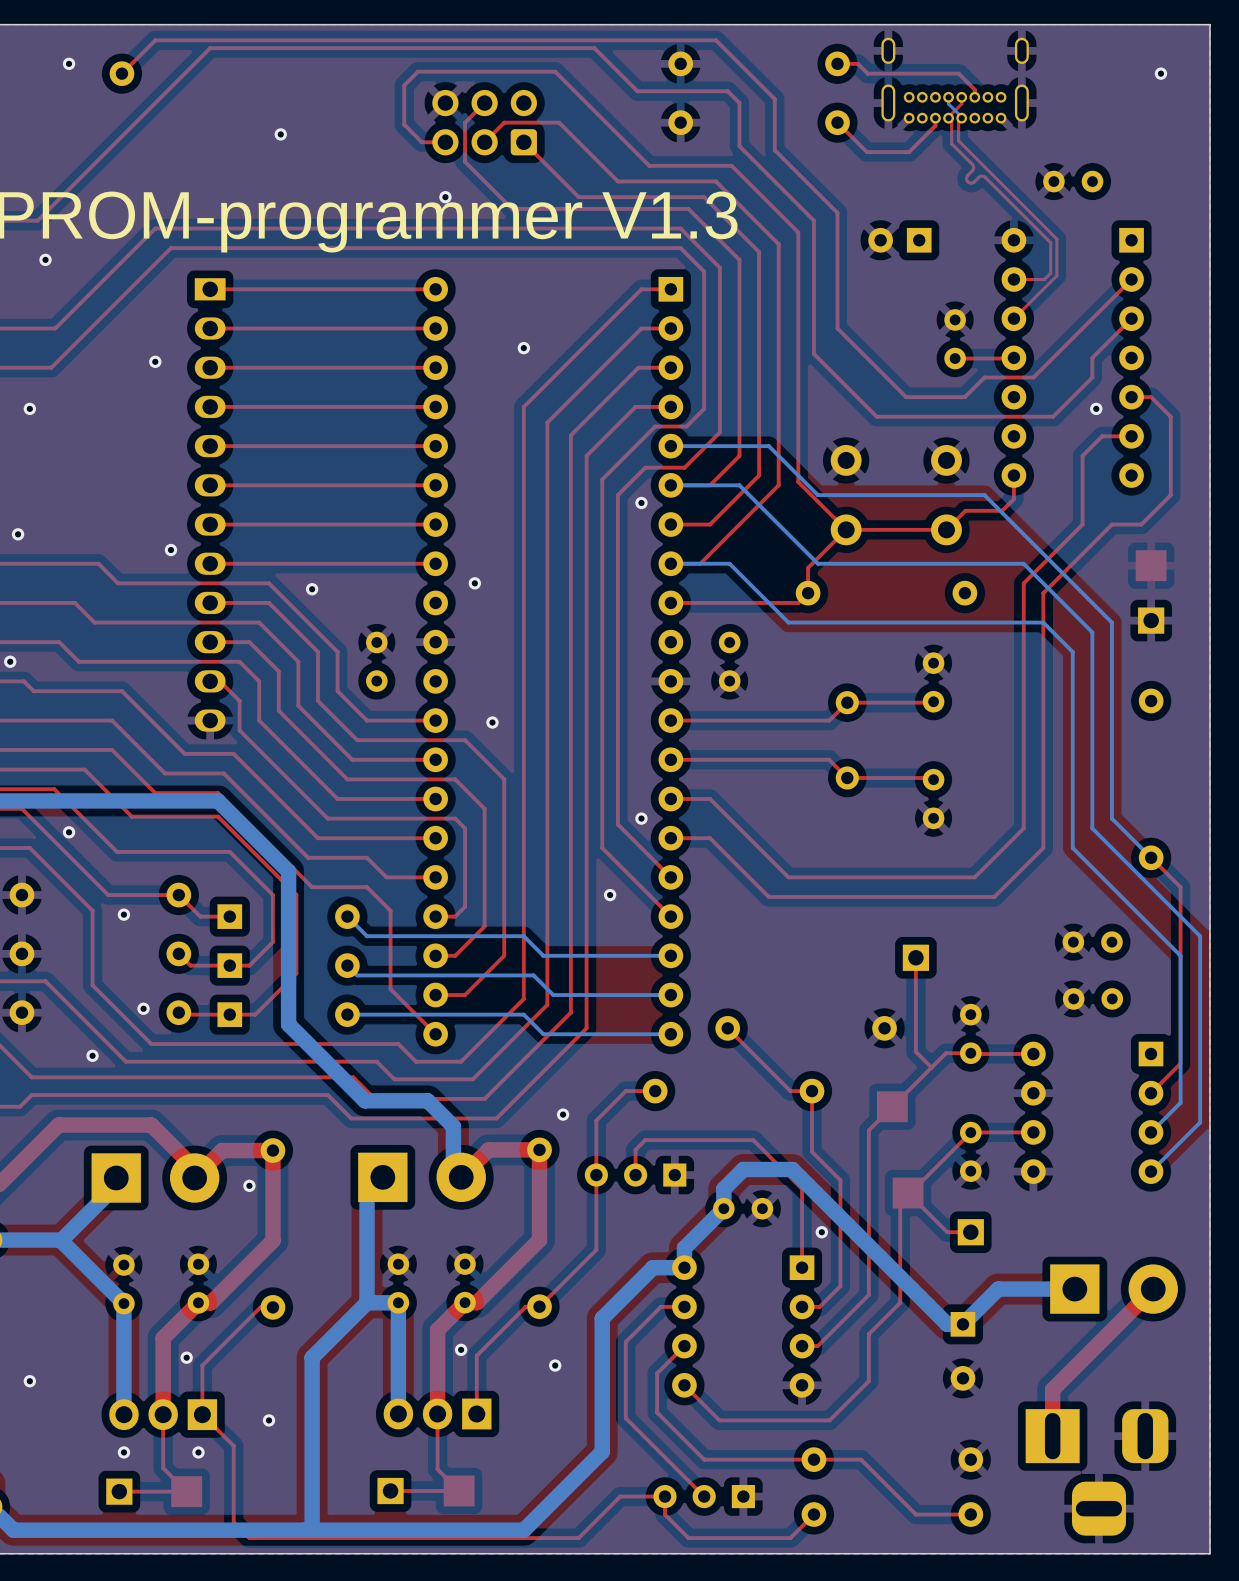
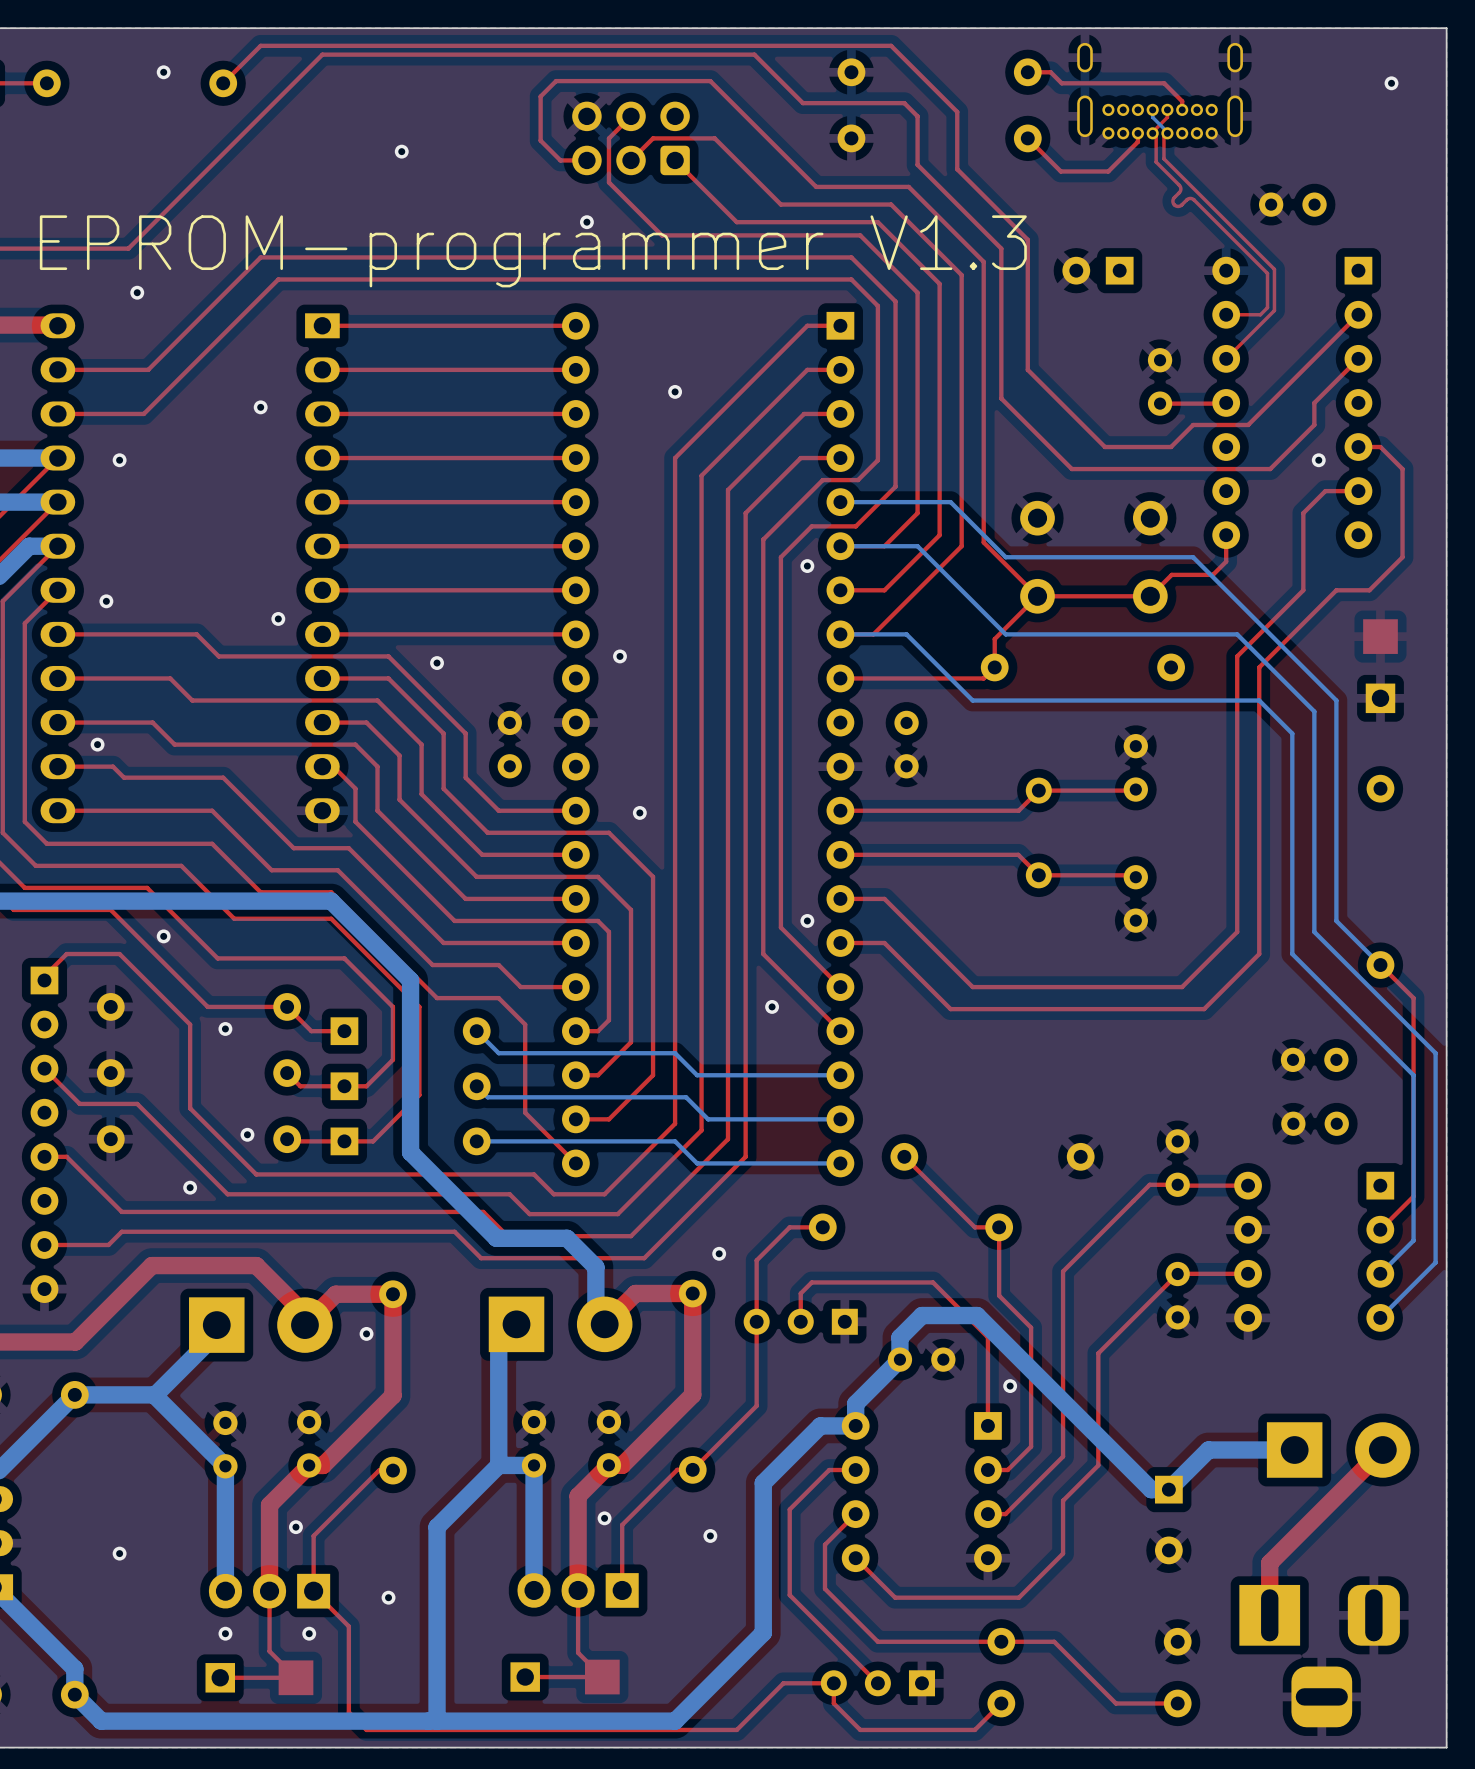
top track: (915, 957) (915, 1051) (931, 1067) -> none
part: (915, 957) -> none
part: (892, 1106) -> none
top track: (908, 1193) (947, 1232) (970, 1232) -> none
part: (908, 1193) -> none
part: (970, 1232) -> none

